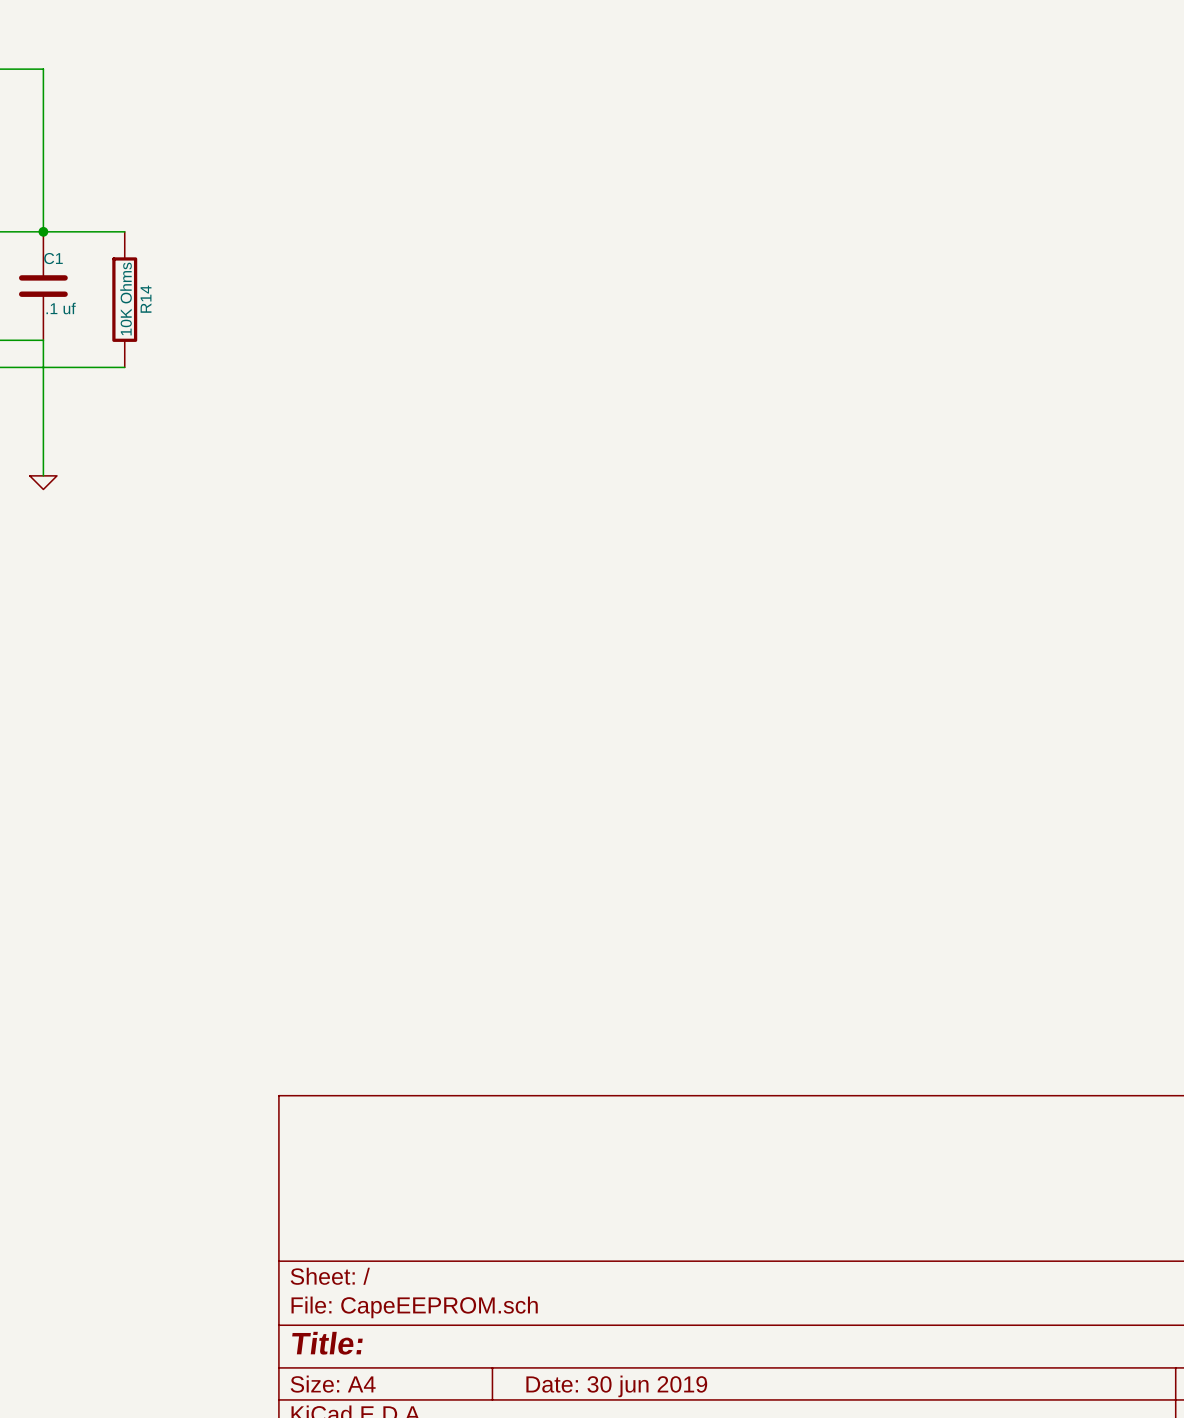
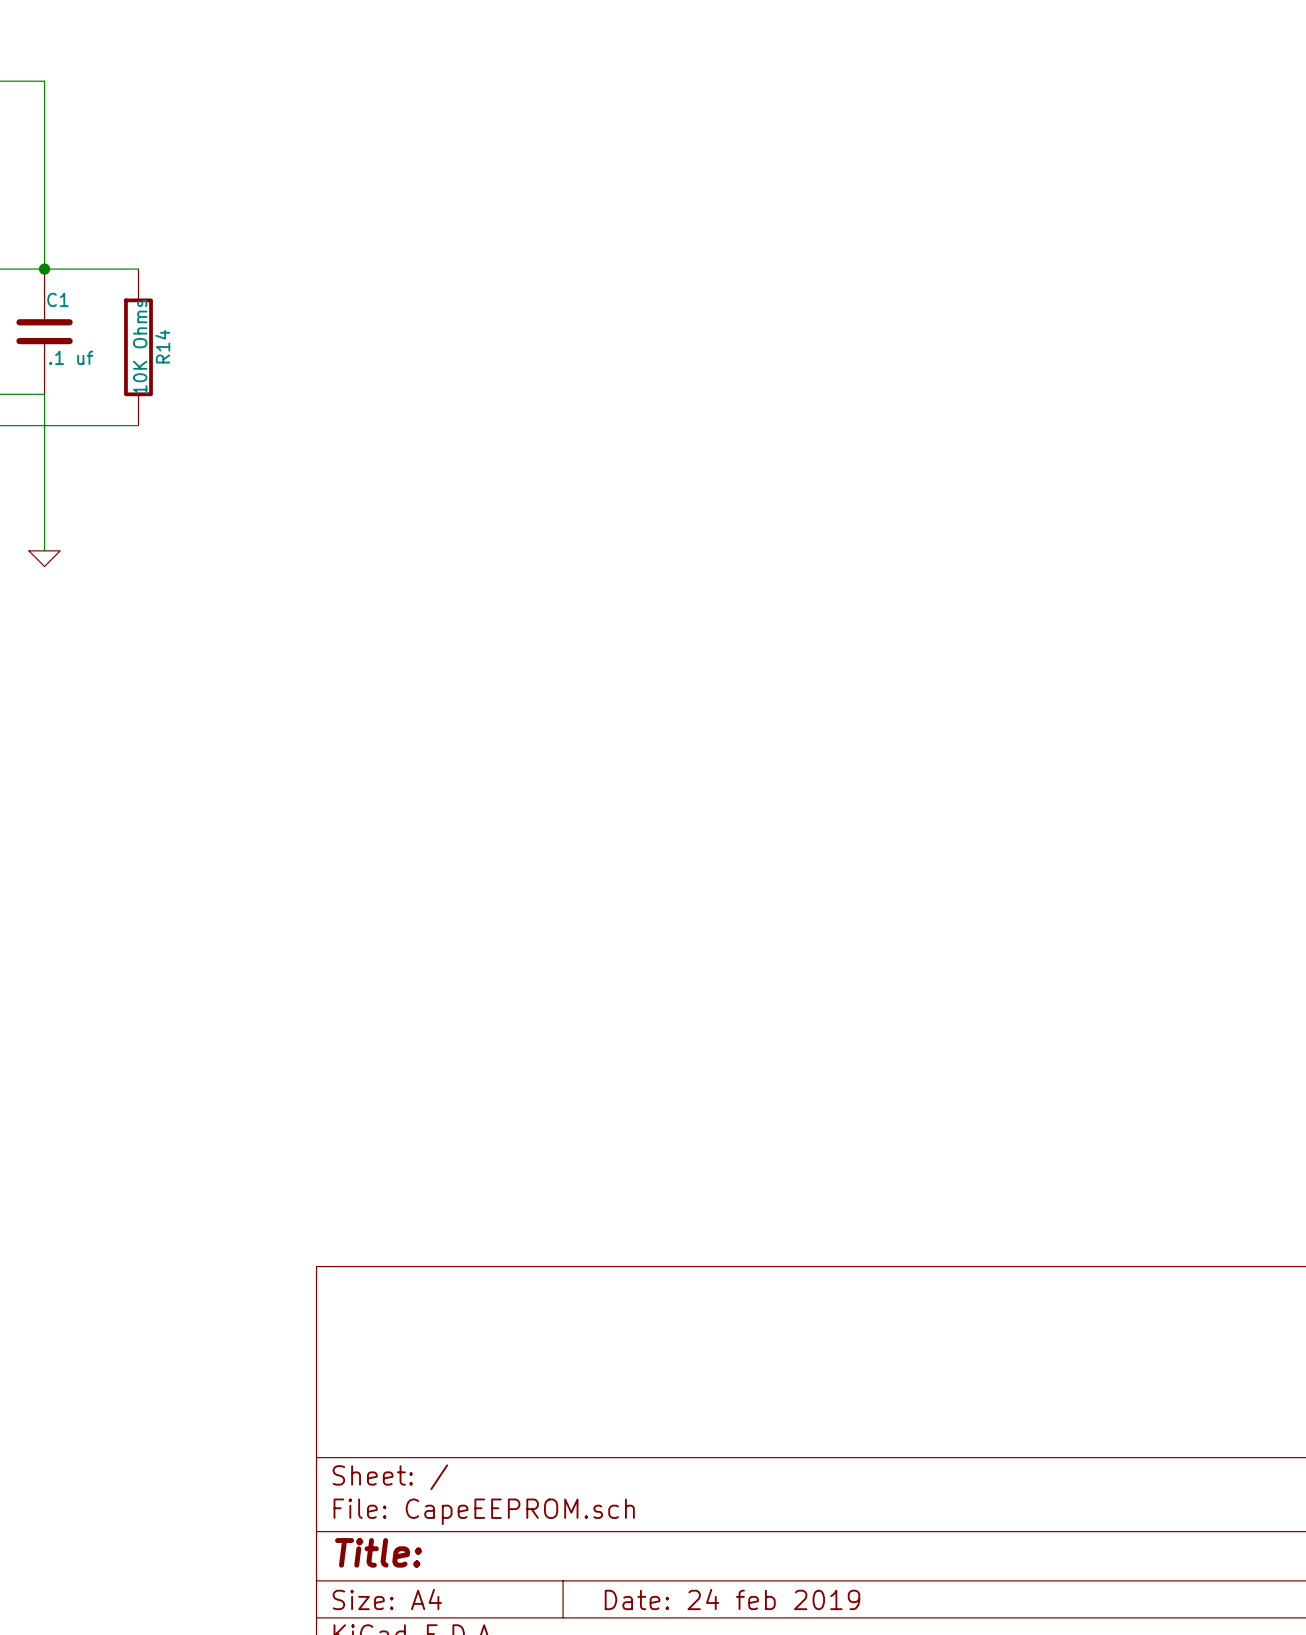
title block: Date: 30 jun 2019 (616, 1386) -> Date: 24 feb 2019 (732, 1599)

